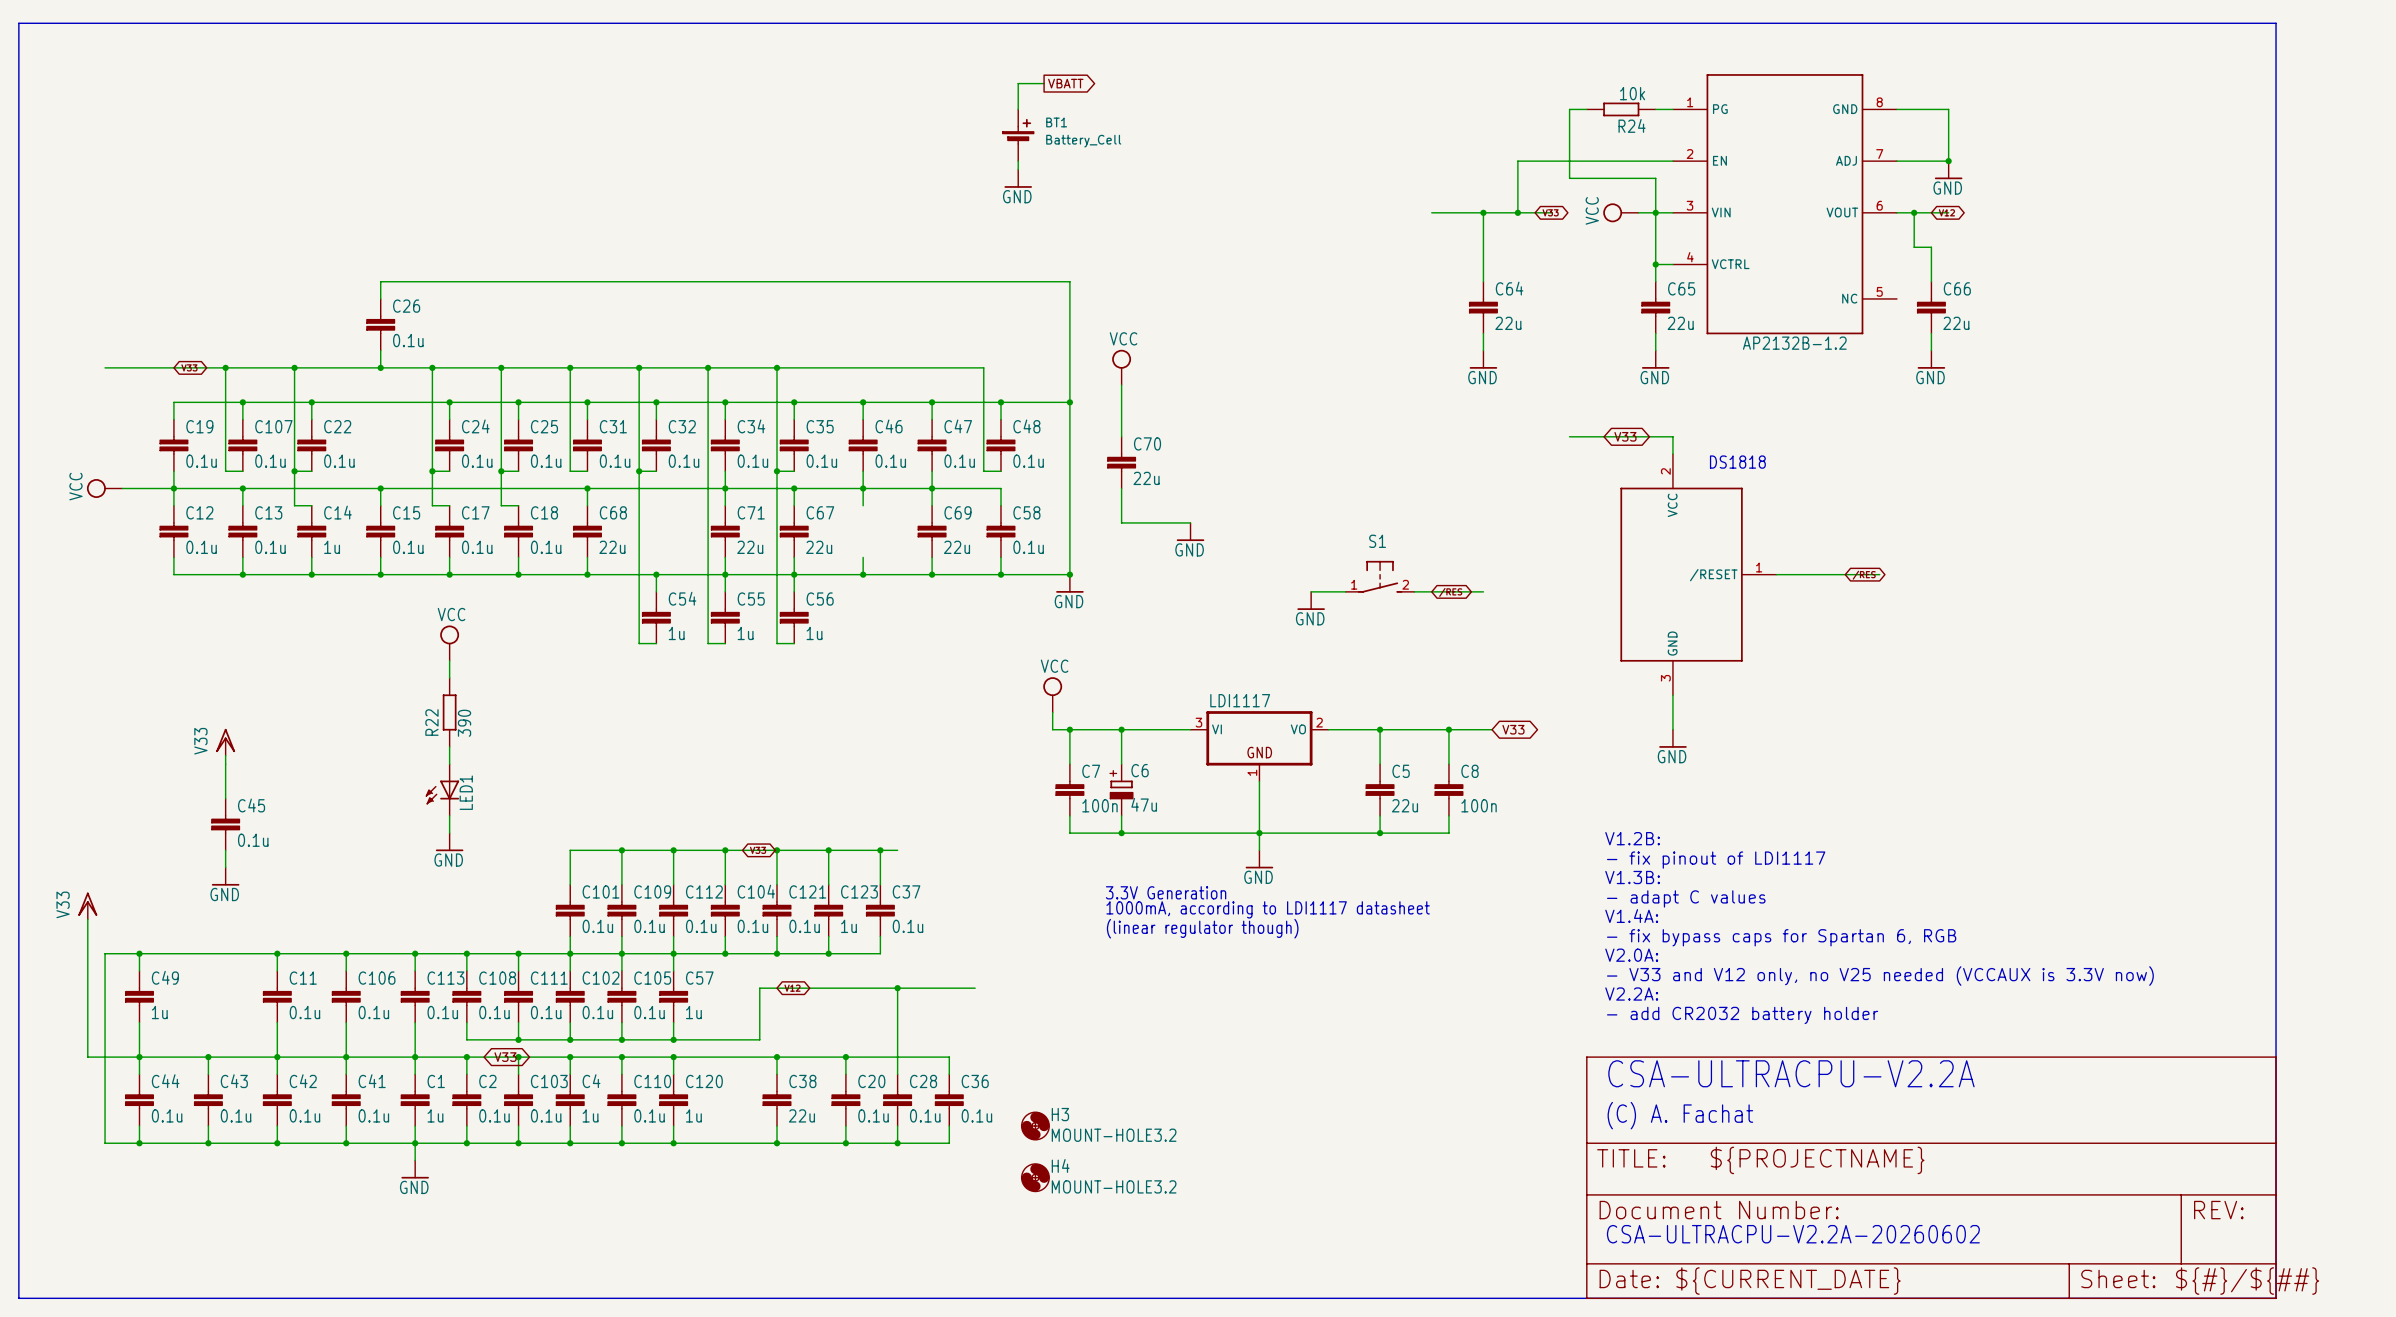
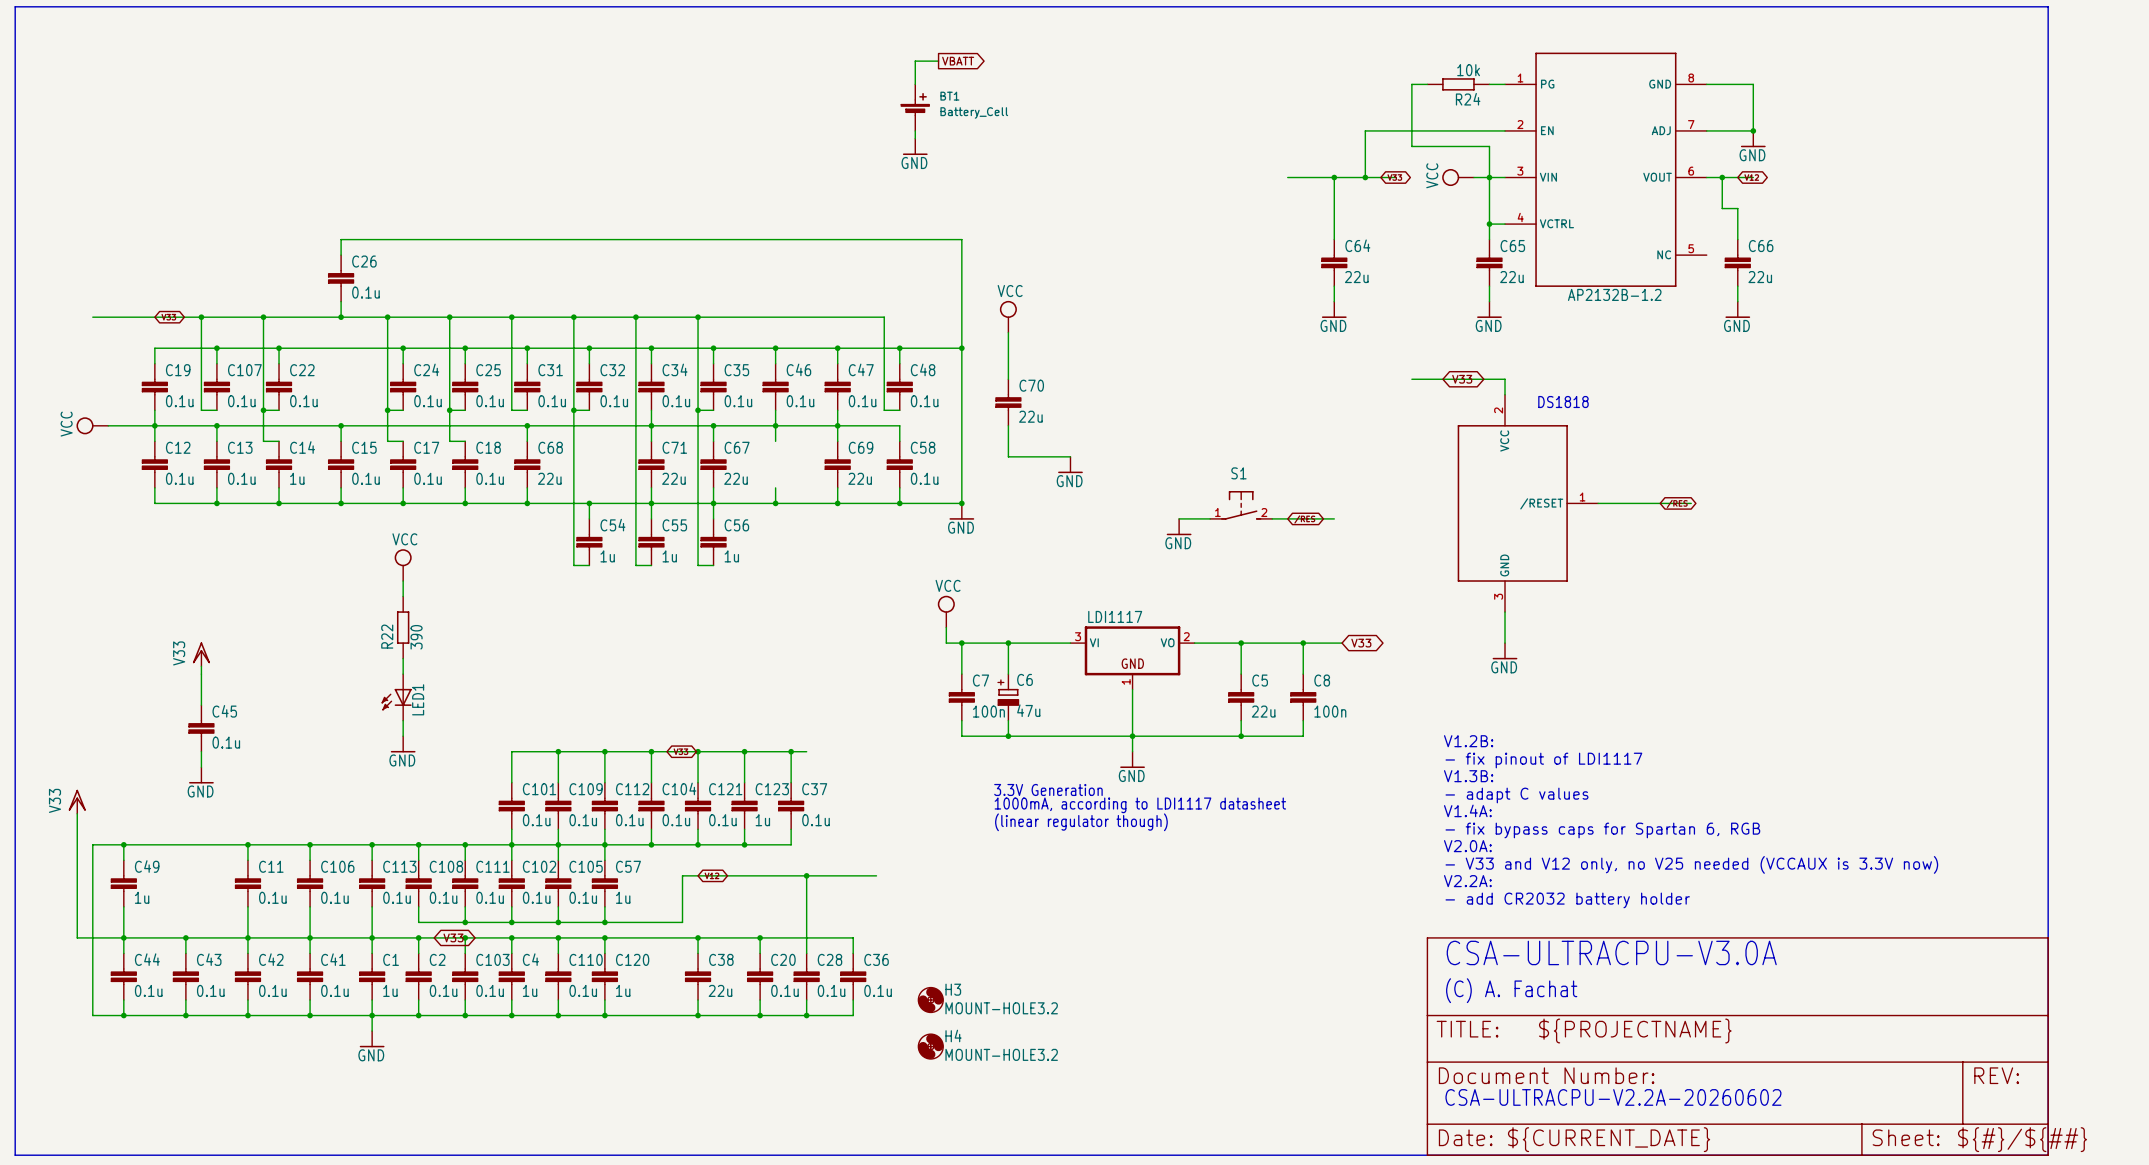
text: CSA-ULTRACPU-V2.2A (1791, 1073) -> CSA-ULTRACPU-V3.0A (1611, 952)

